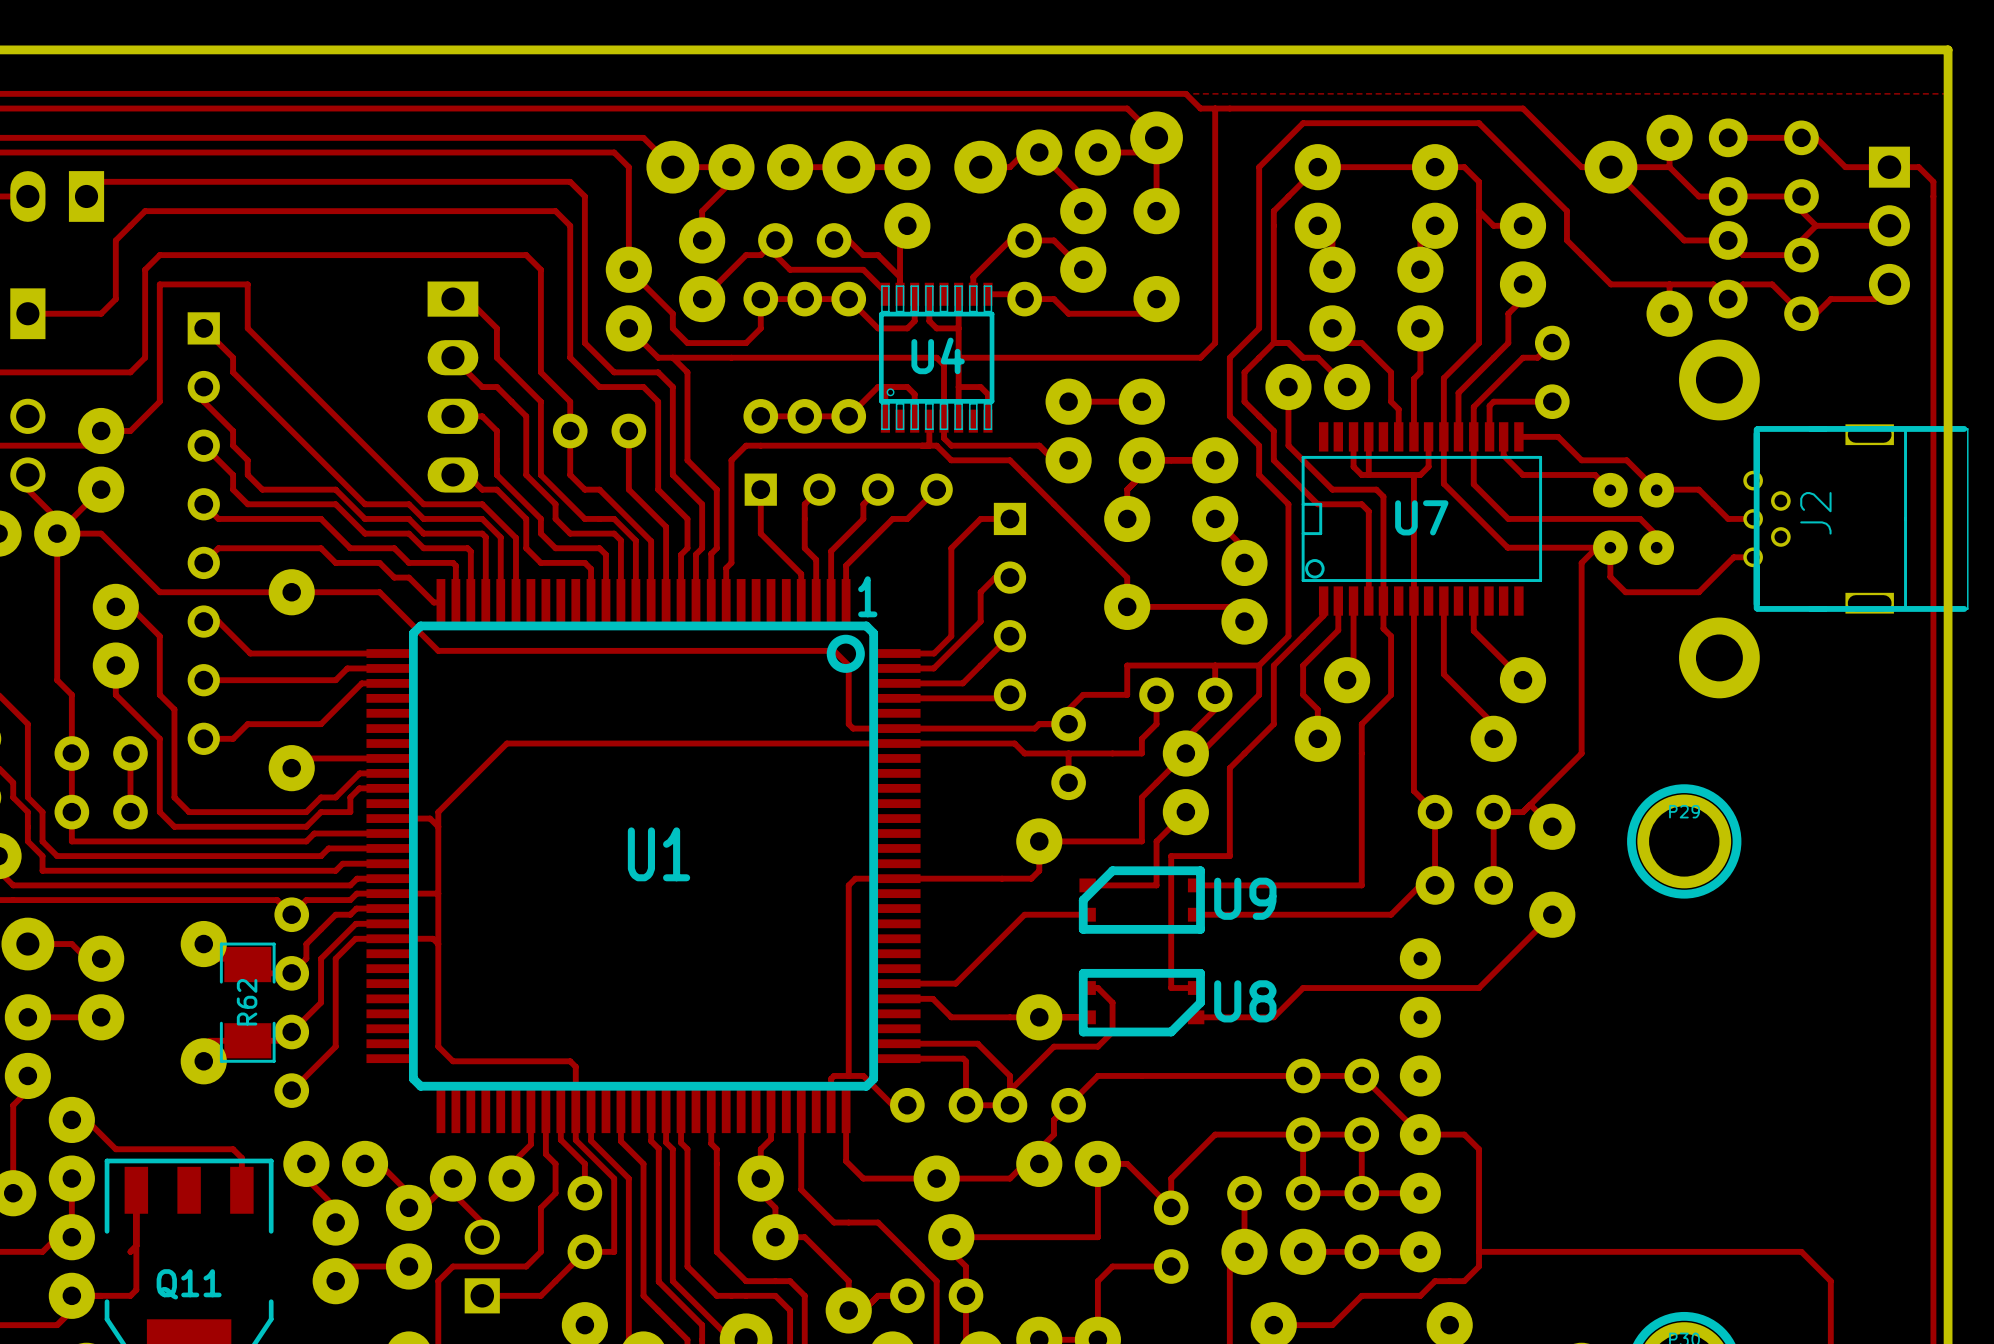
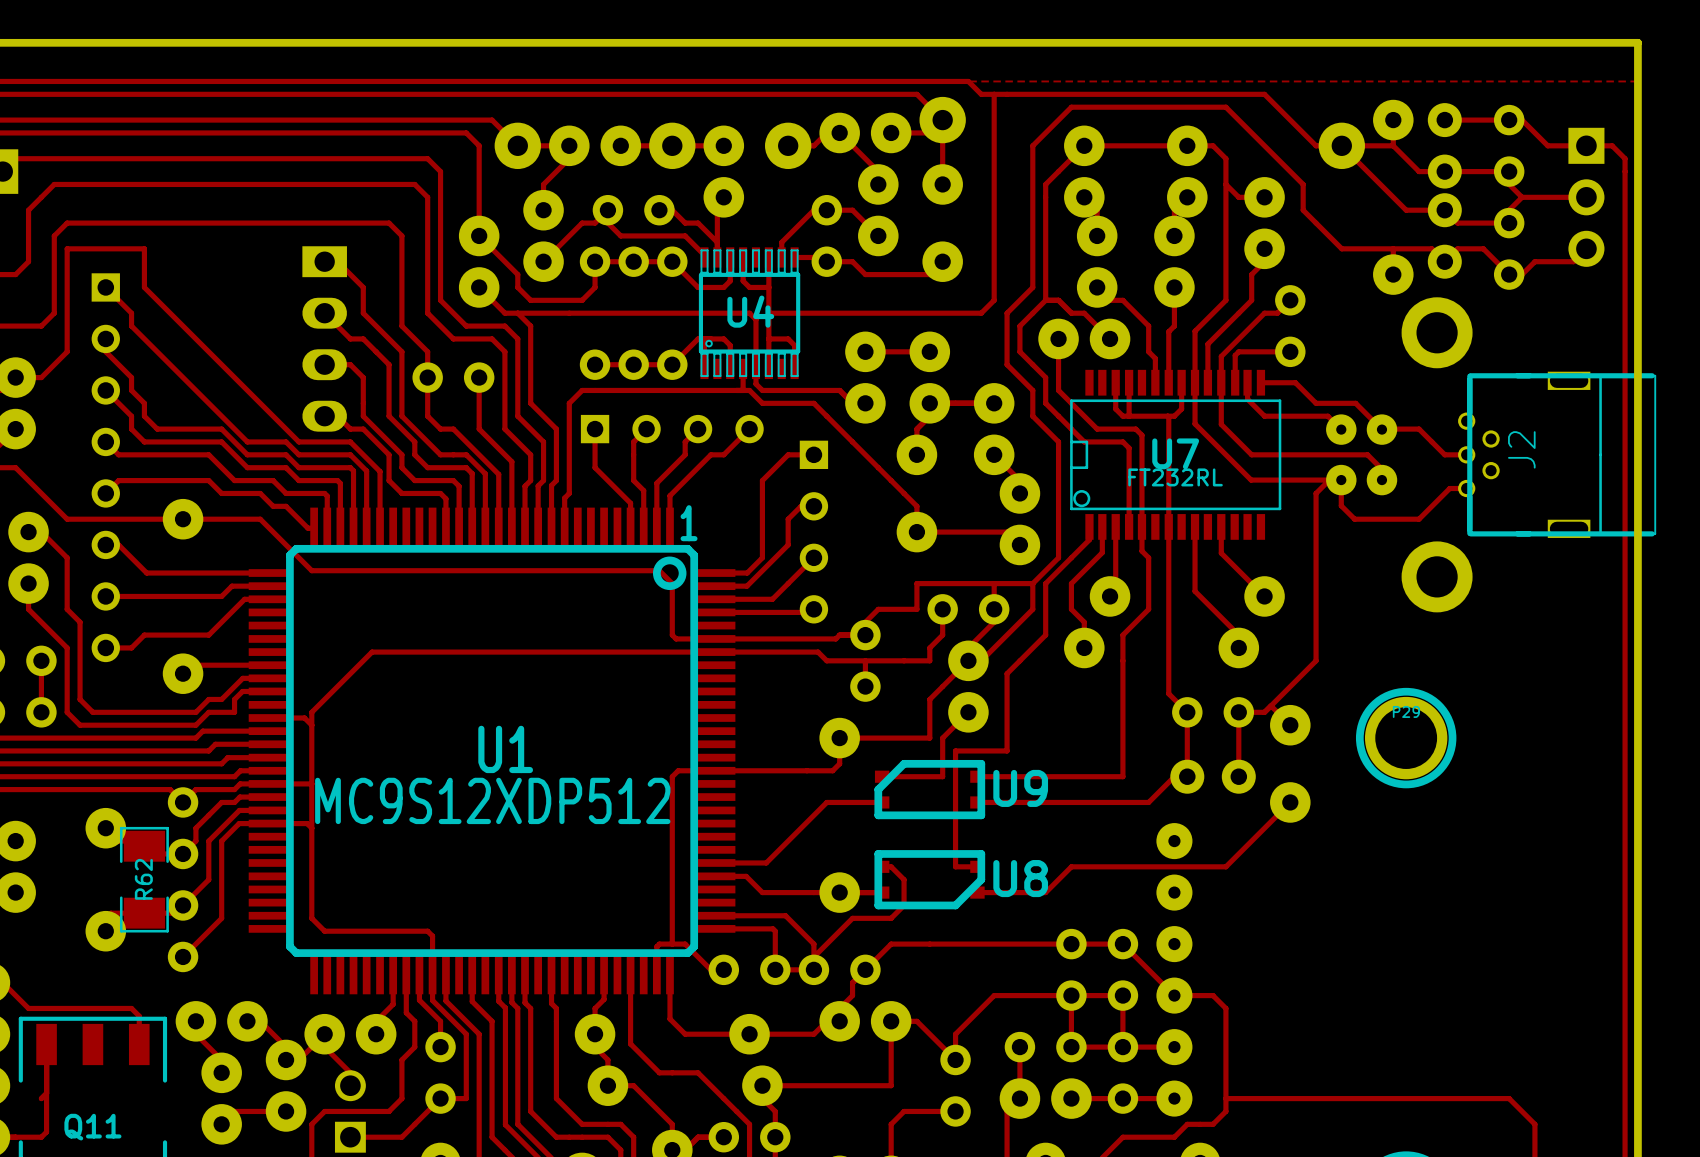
U7 value: none -> FT232RL (1175, 477)
U1 value: none -> MC9S12XDP512 (492, 800)

